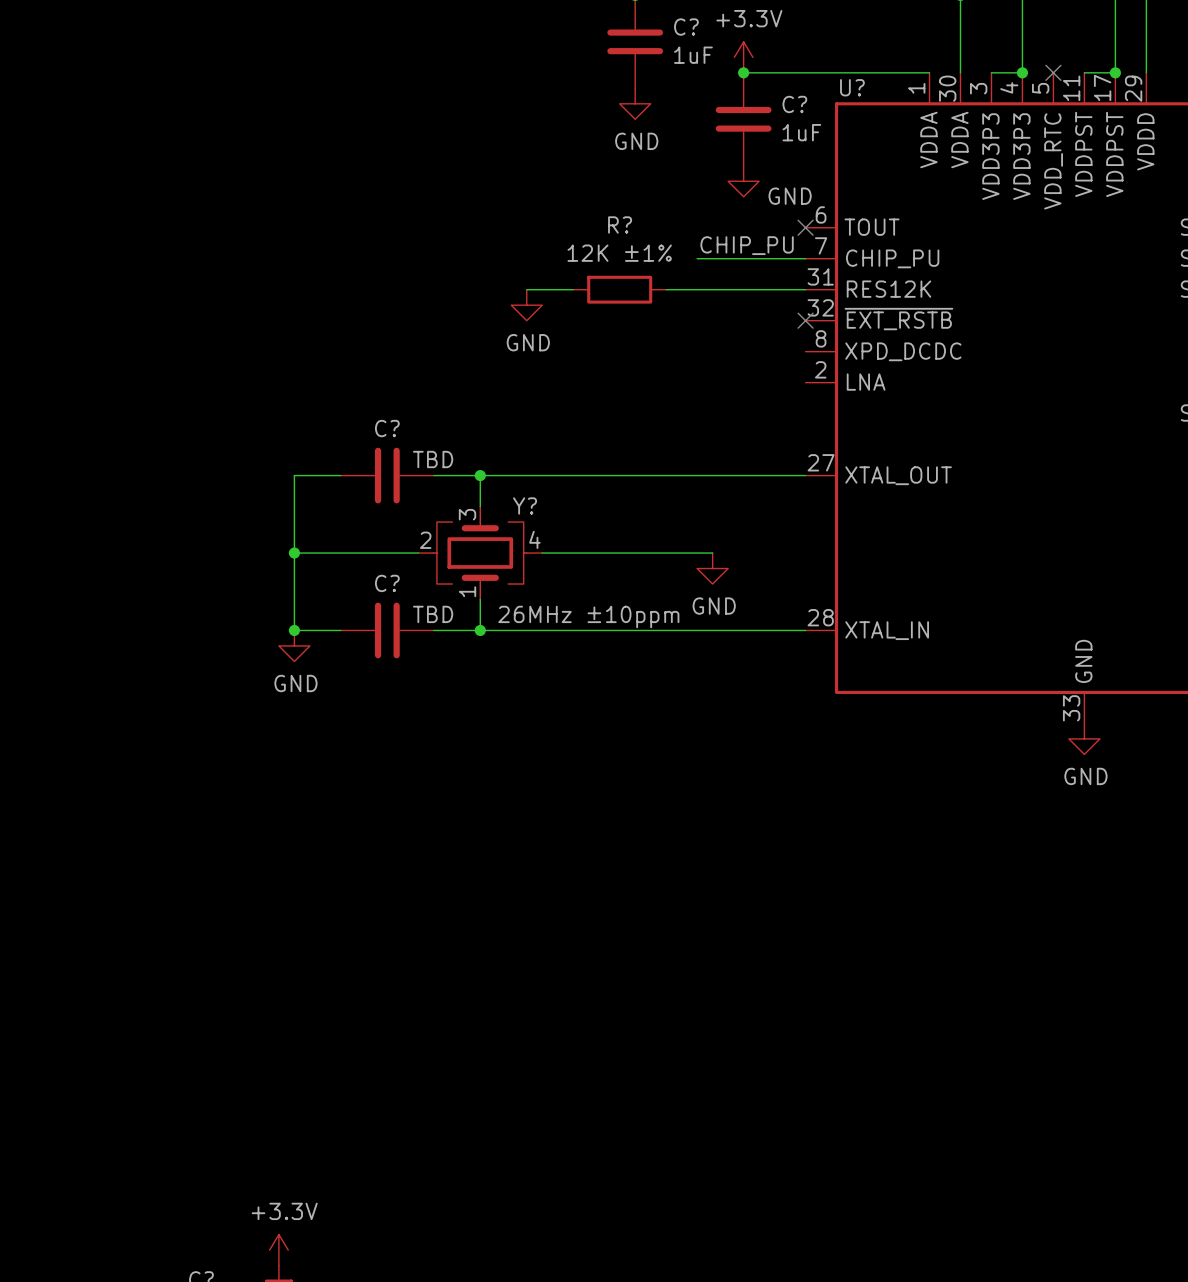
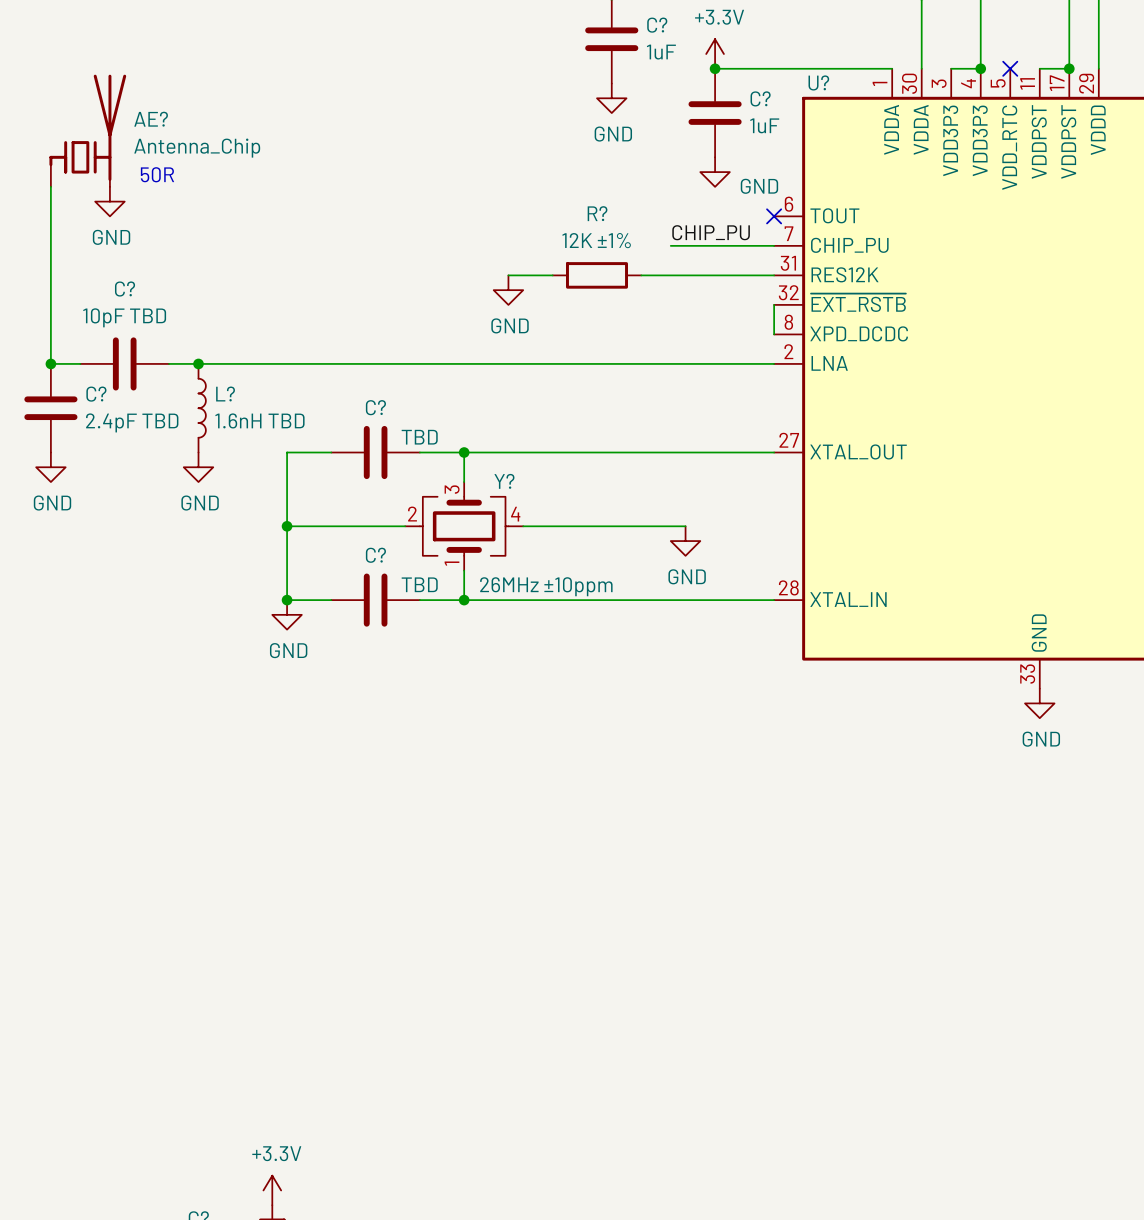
AE?: none -> Antenna_Chip (87, 130)
text: none -> 50R (157, 174)
wire: none -> (50, 186) (50, 363) (80, 363)
power symbol: none -> GND (109, 201)
wire: none -> (774, 304) (774, 334)
no-connect mark: (805, 320) -> none
junction: none -> (50, 363)
C?: none -> 10pF TBD (124, 363)
wire: none -> (168, 363) (774, 363)
junction: none -> (198, 363)
C?: none -> 2.4pF TBD (50, 408)
L?: none -> 1.6nH TBD (202, 408)
power symbol: none -> GND (50, 467)
power symbol: none -> GND (198, 467)

